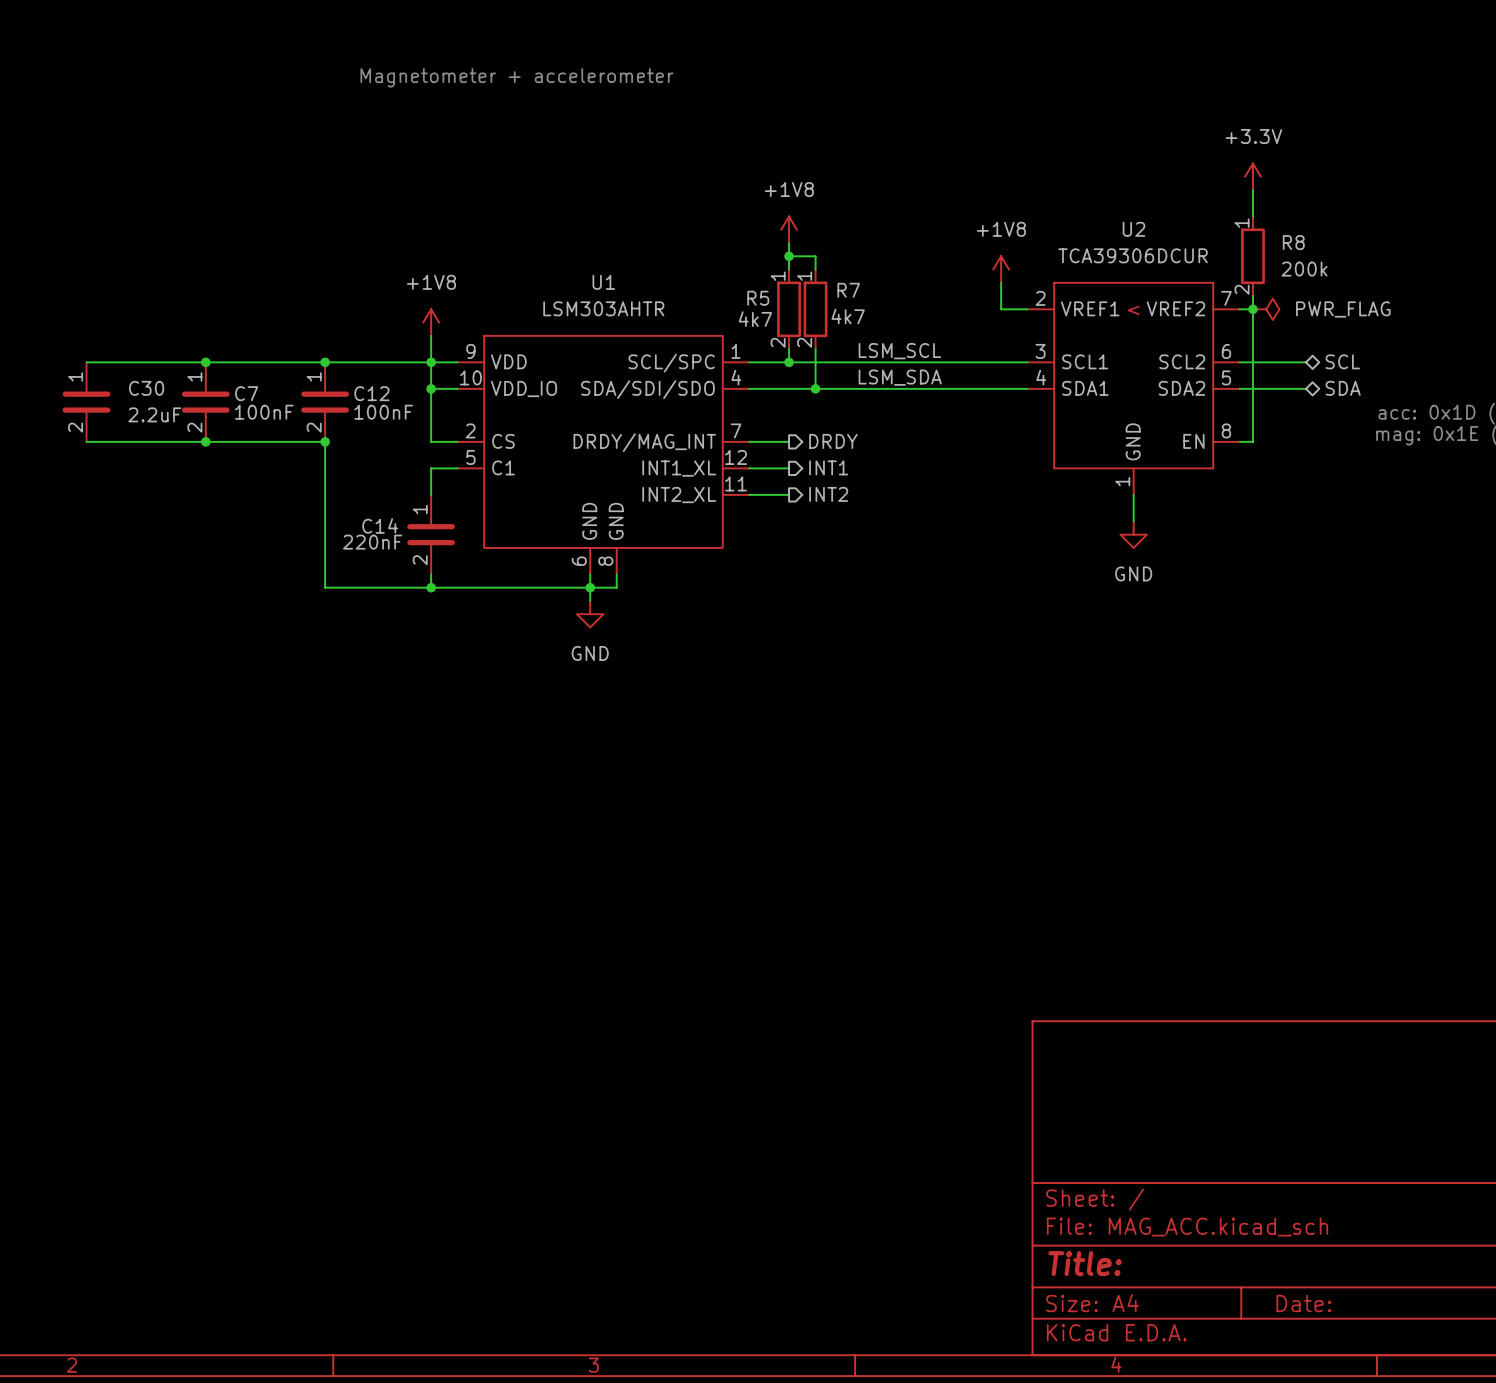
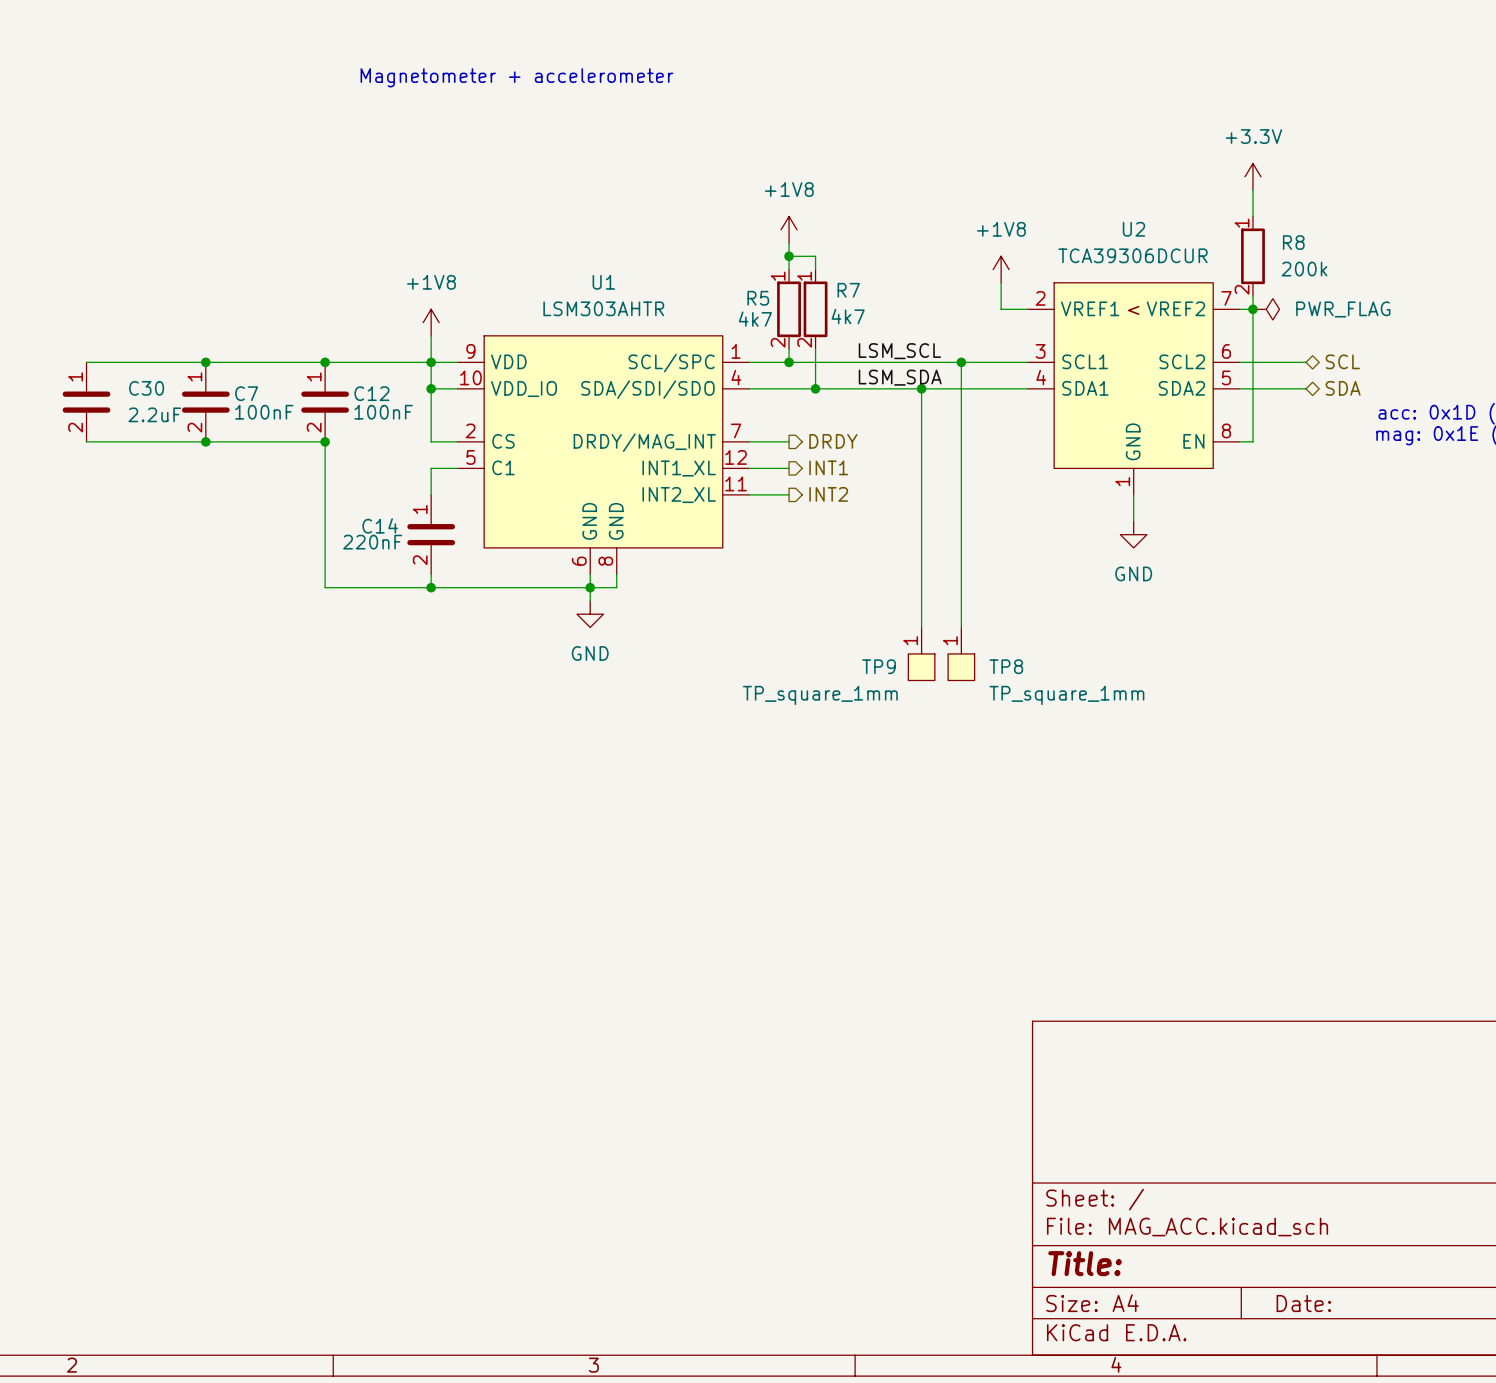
wire: none -> (961, 362) (961, 627)
junction: none -> (961, 362)
wire: none -> (921, 388) (921, 627)
junction: none -> (921, 388)
TP9: none -> TP_square_1mm (921, 653)
TP8: none -> TP_square_1mm (961, 653)

